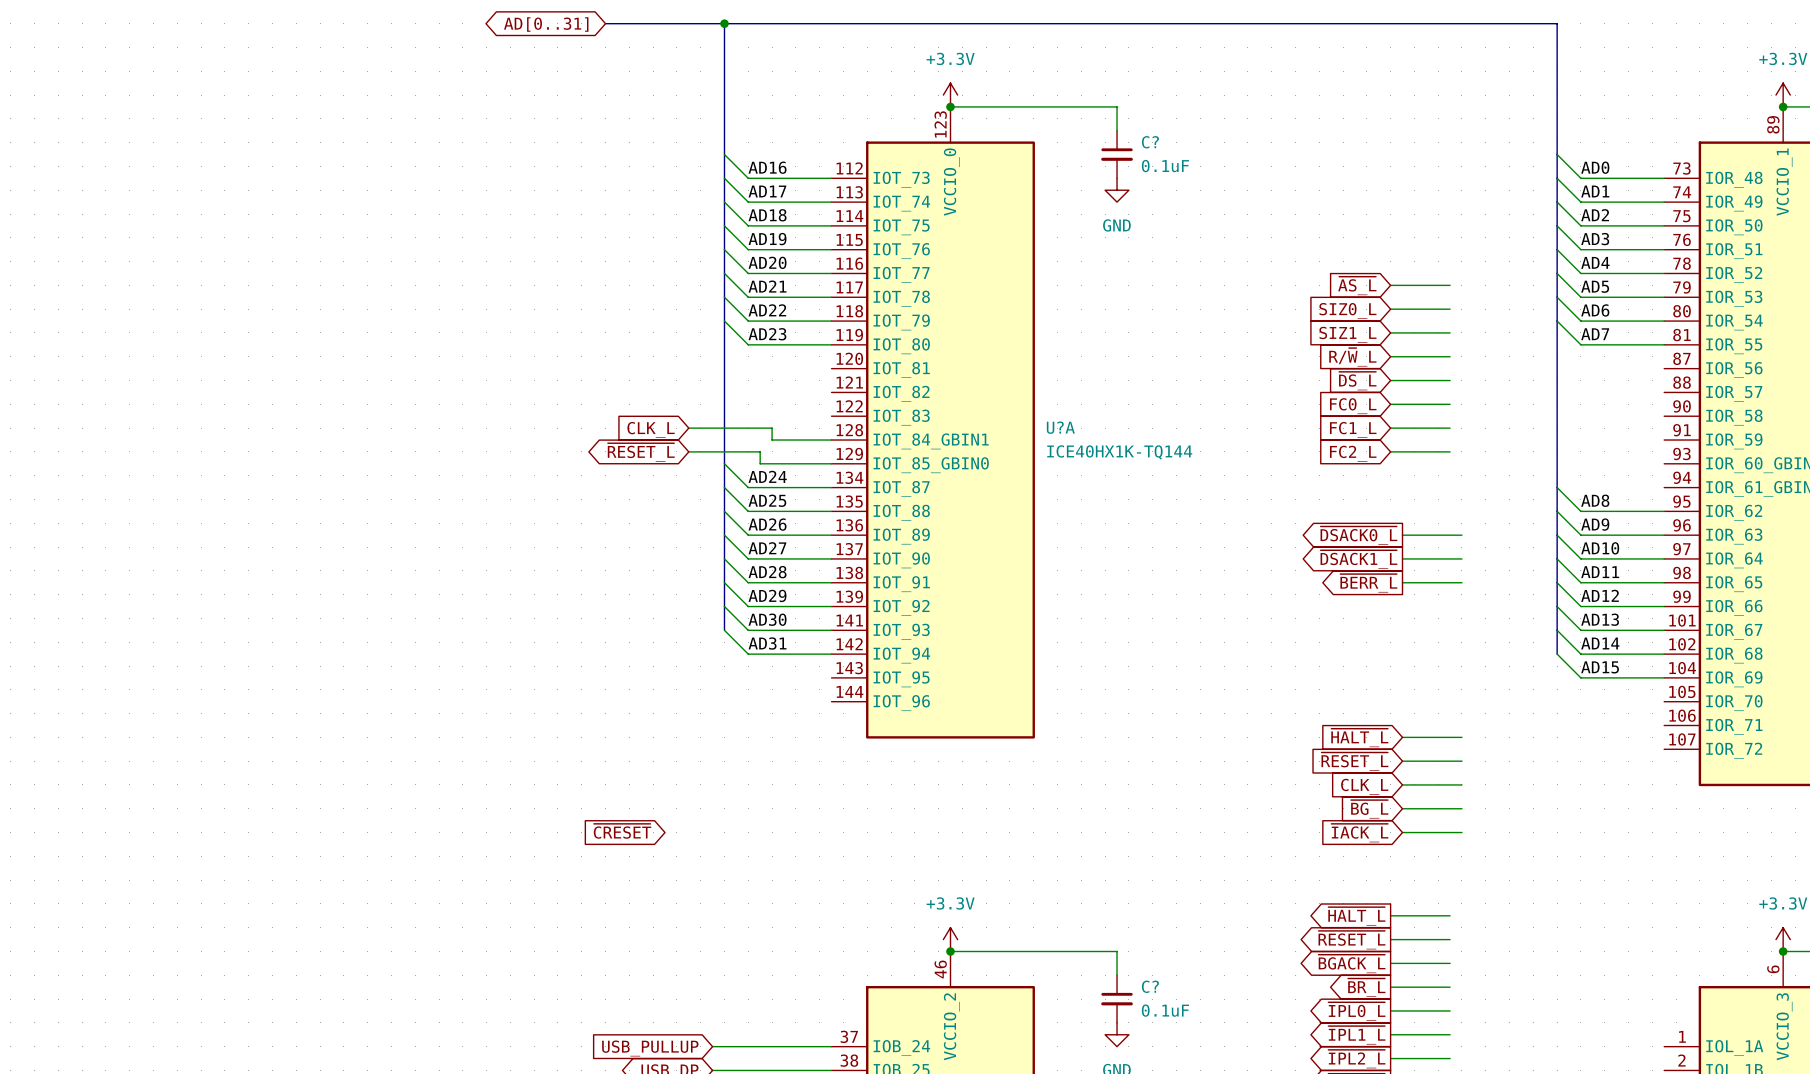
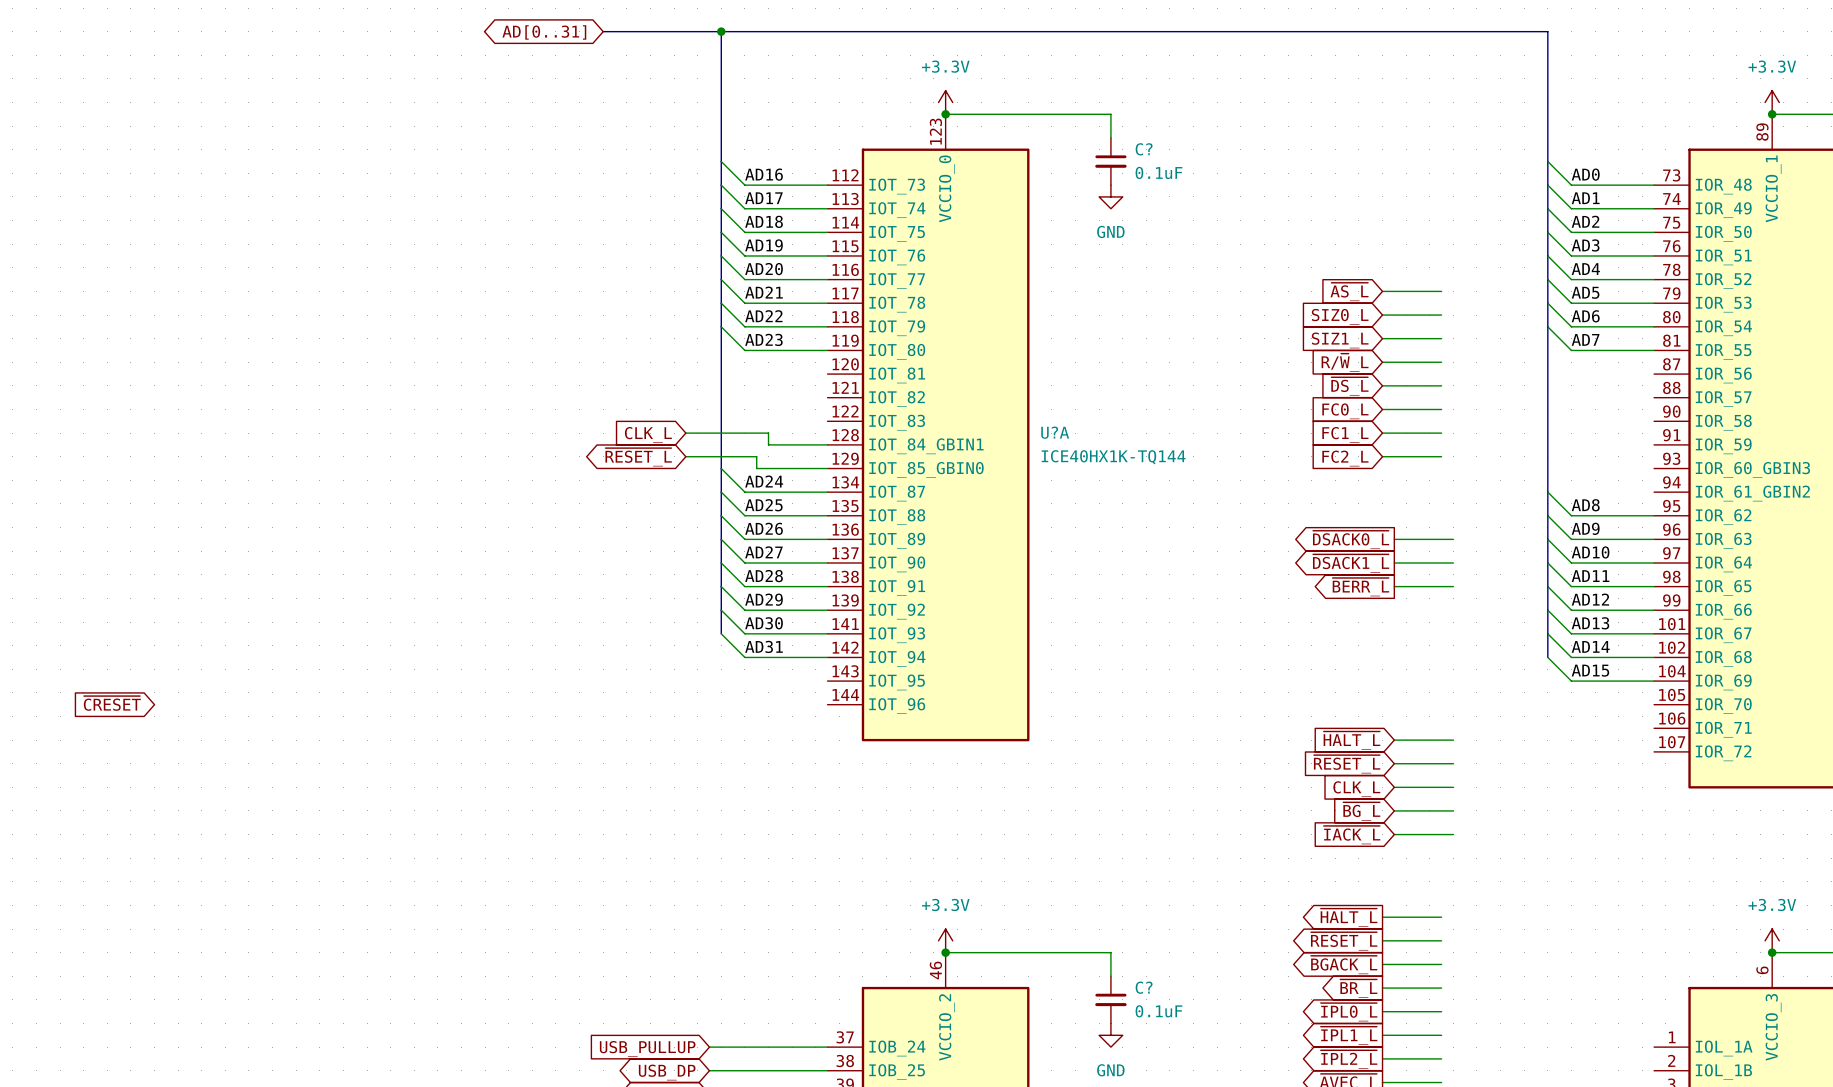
global label: none -> ~{CRESET} (112, 703)
global label: ~{CRESET} (622, 831) -> none

